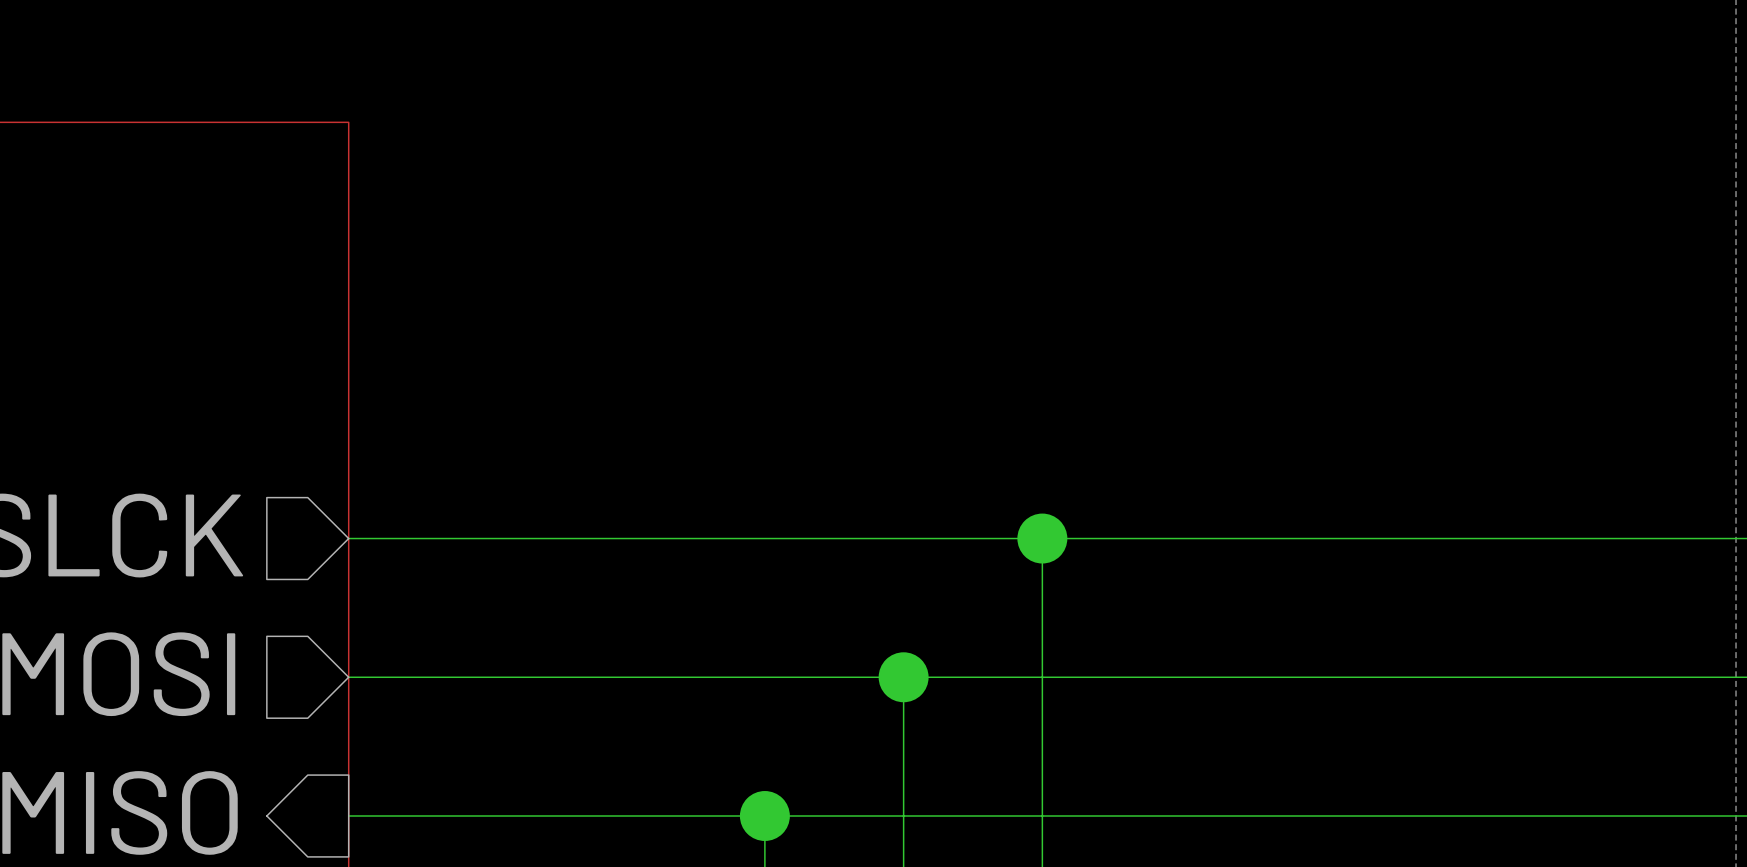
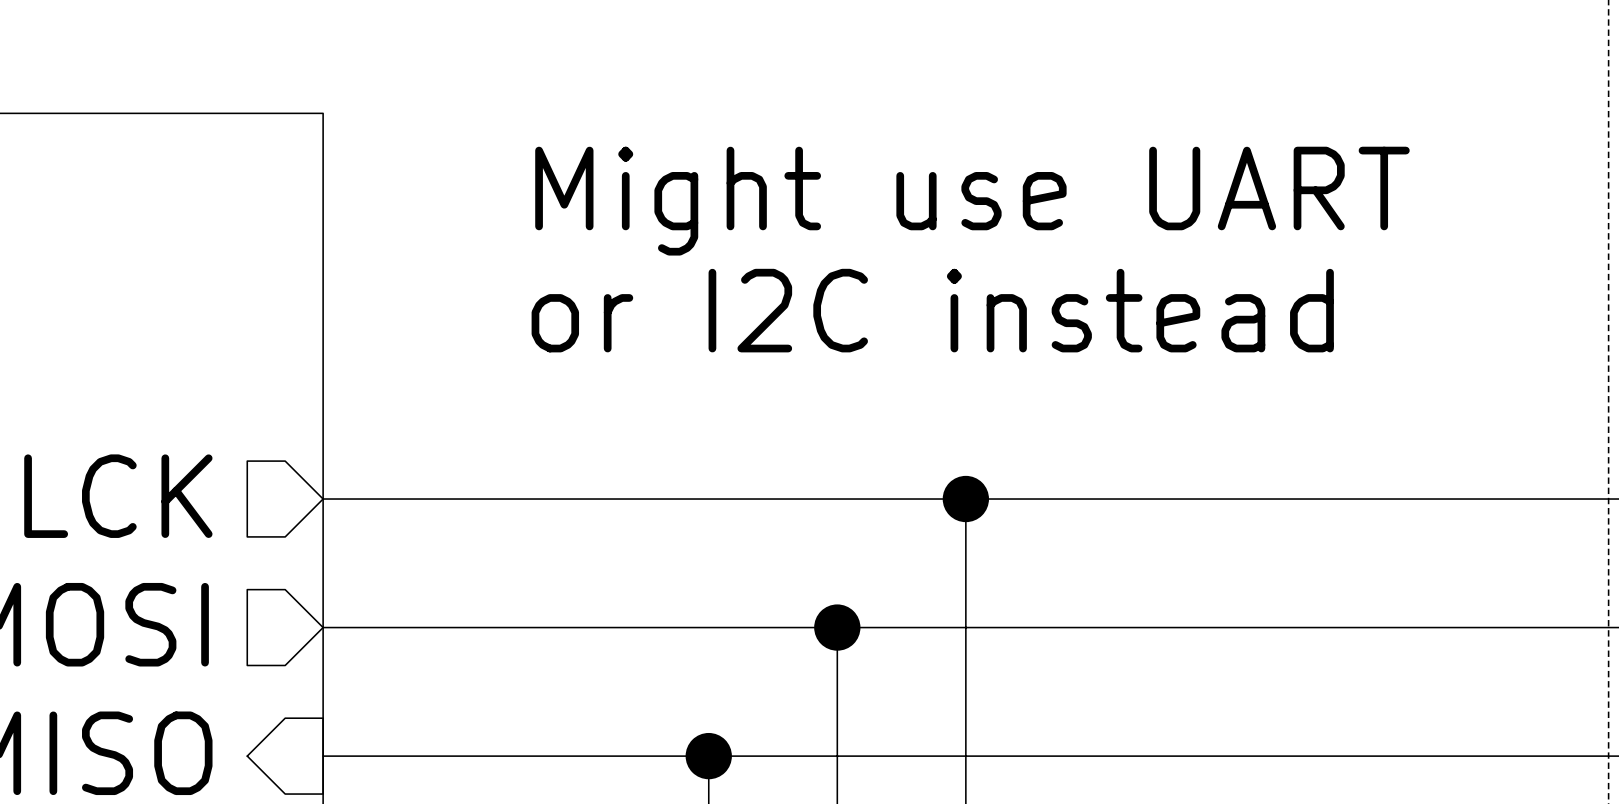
text: none -> Might use UART (972, 201)
text: none -> or I2C instead (932, 310)

